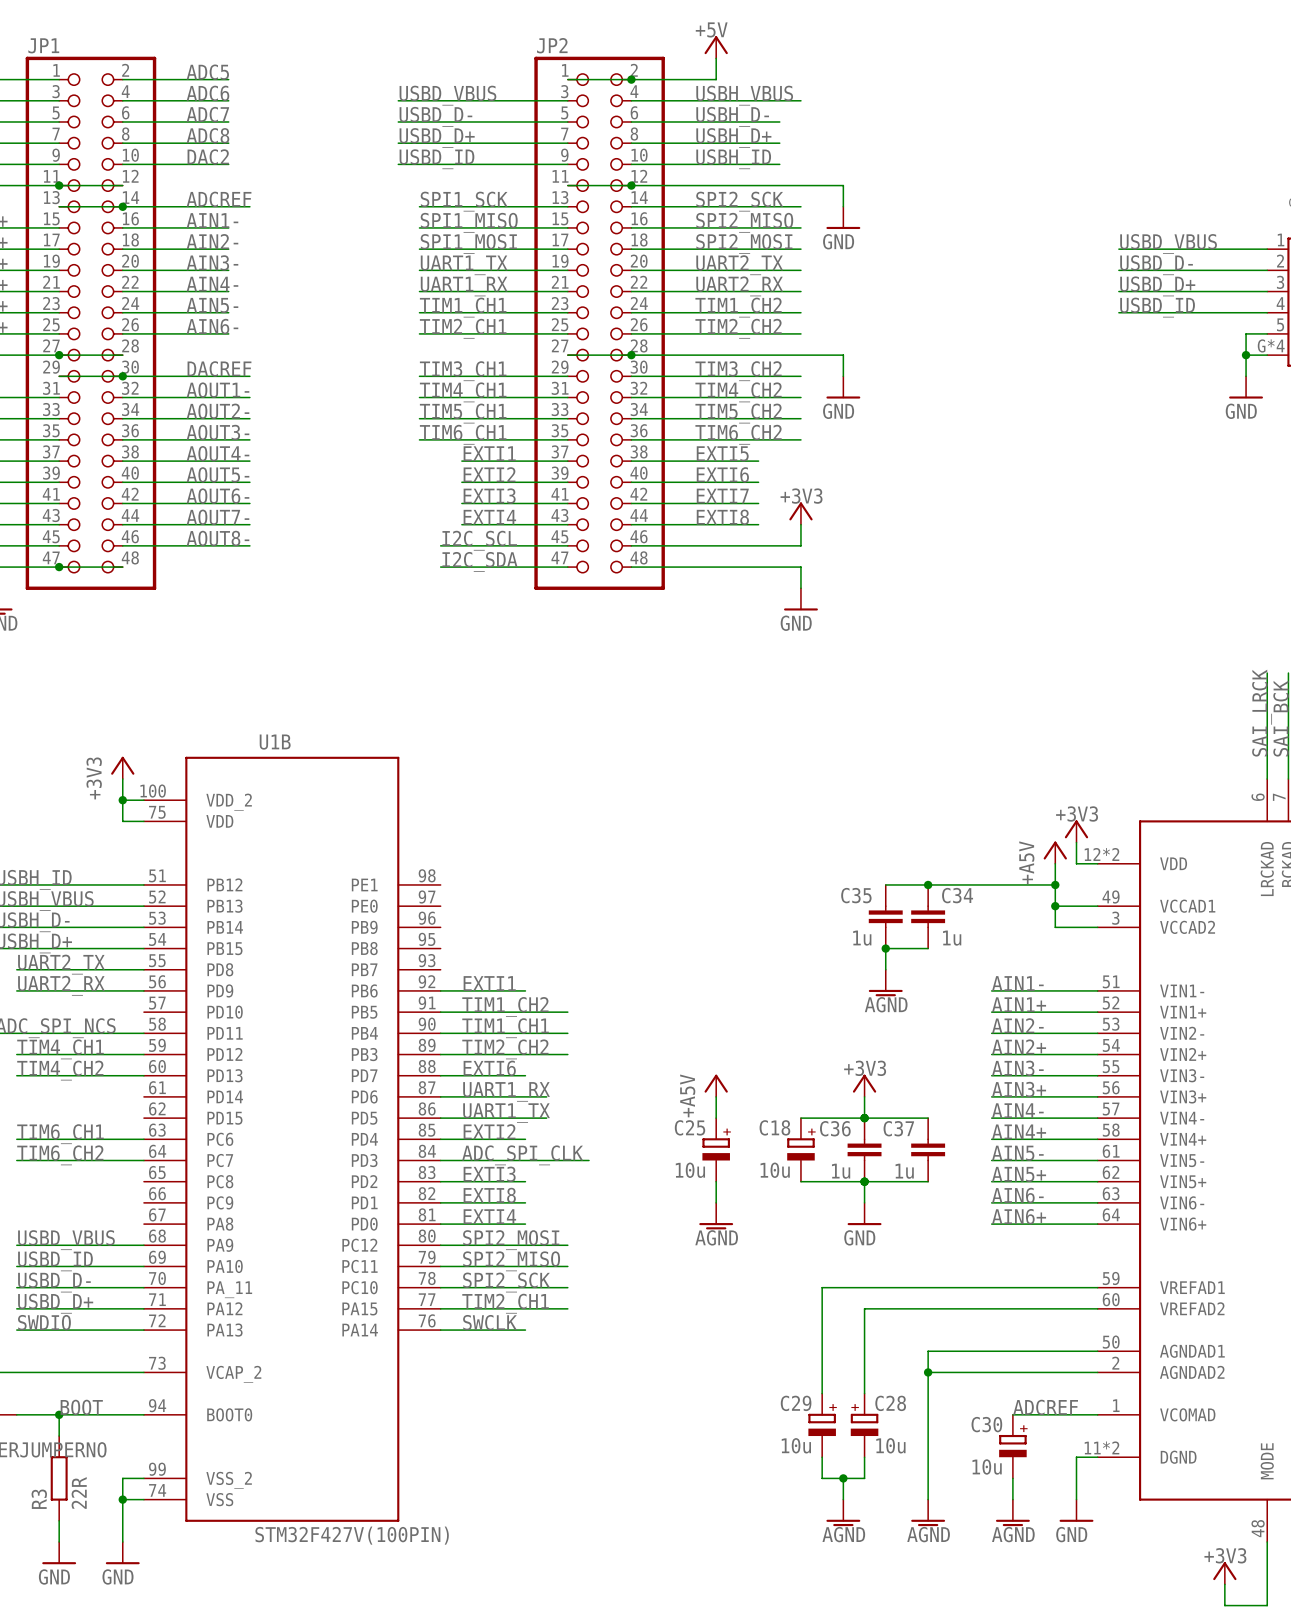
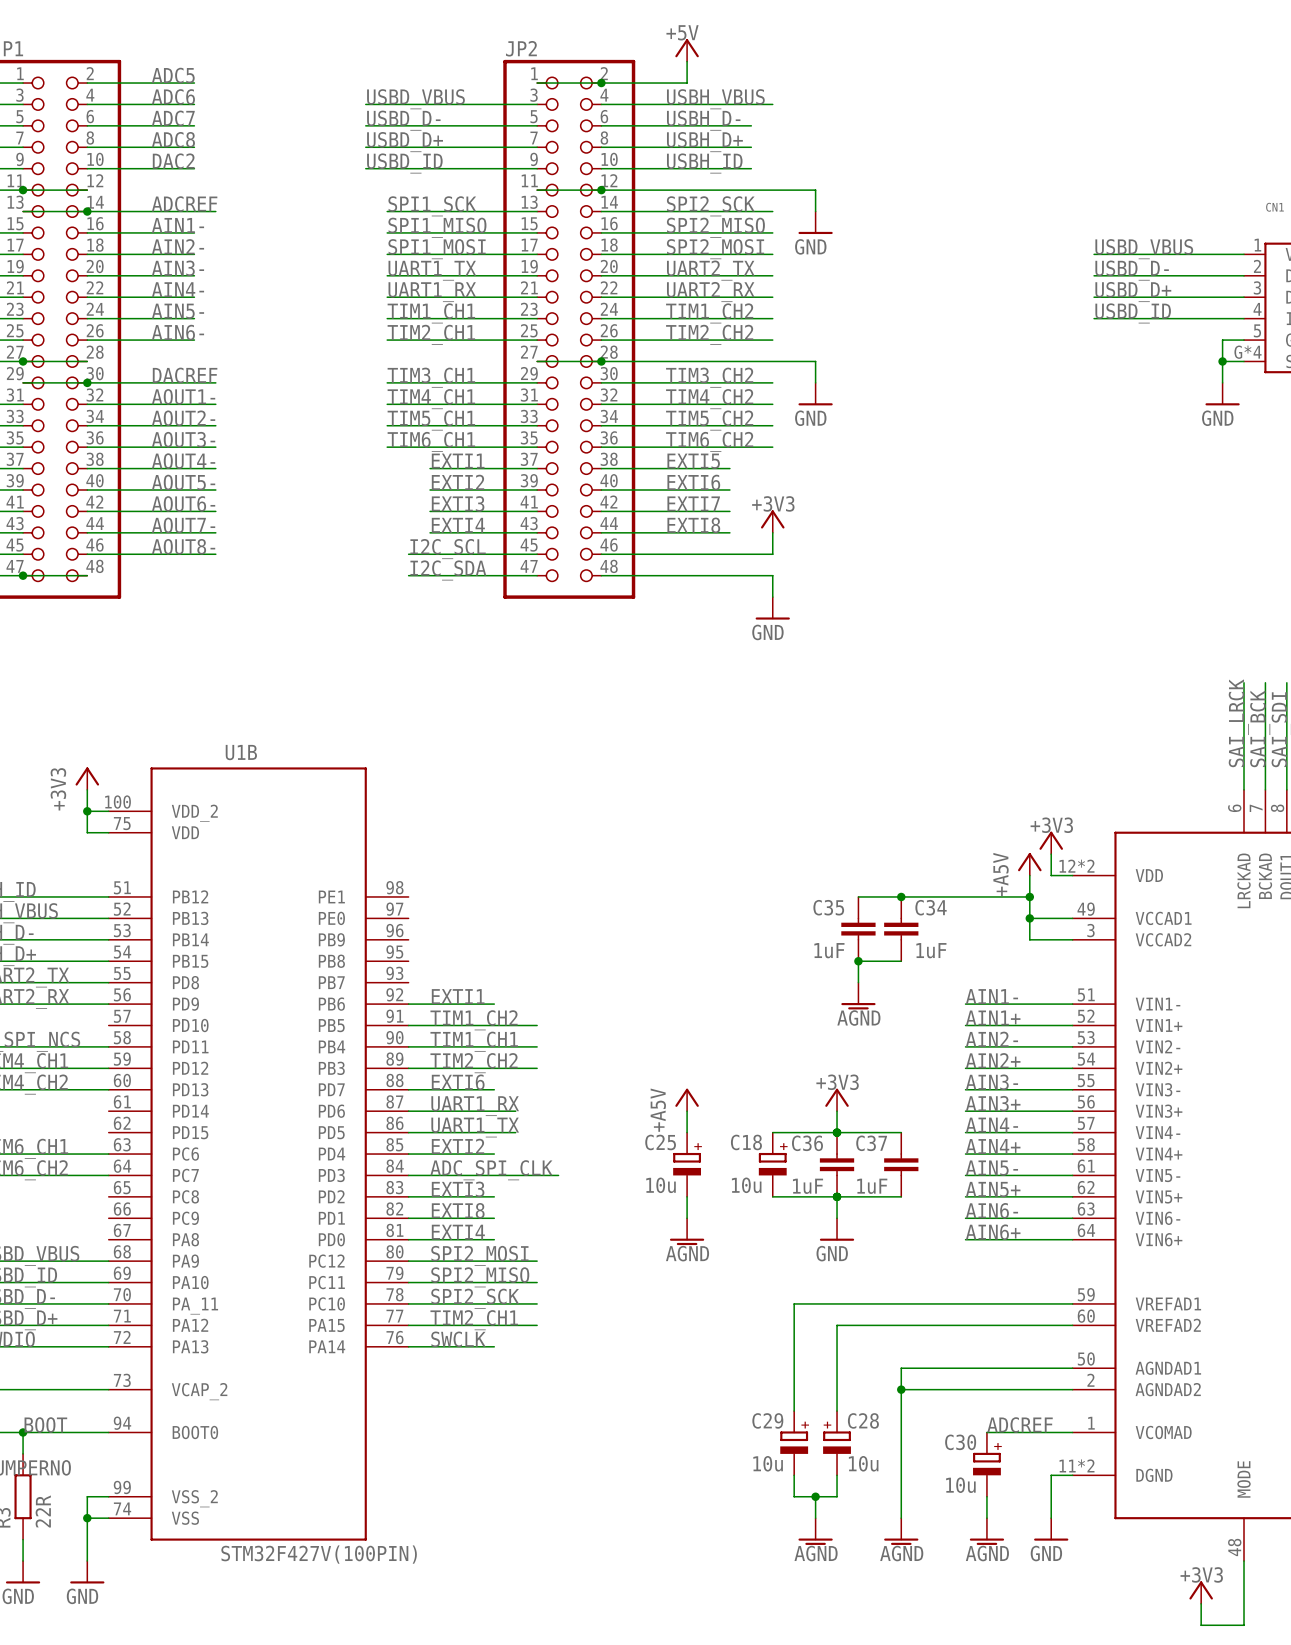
C35 value: 1u (862, 938) -> 1uF (829, 950)
C34 value: 1u (952, 938) -> 1uF (931, 950)
C36 value: 1u (841, 1171) -> 1uF (808, 1186)
C37 value: 1u (904, 1171) -> 1uF (872, 1186)

